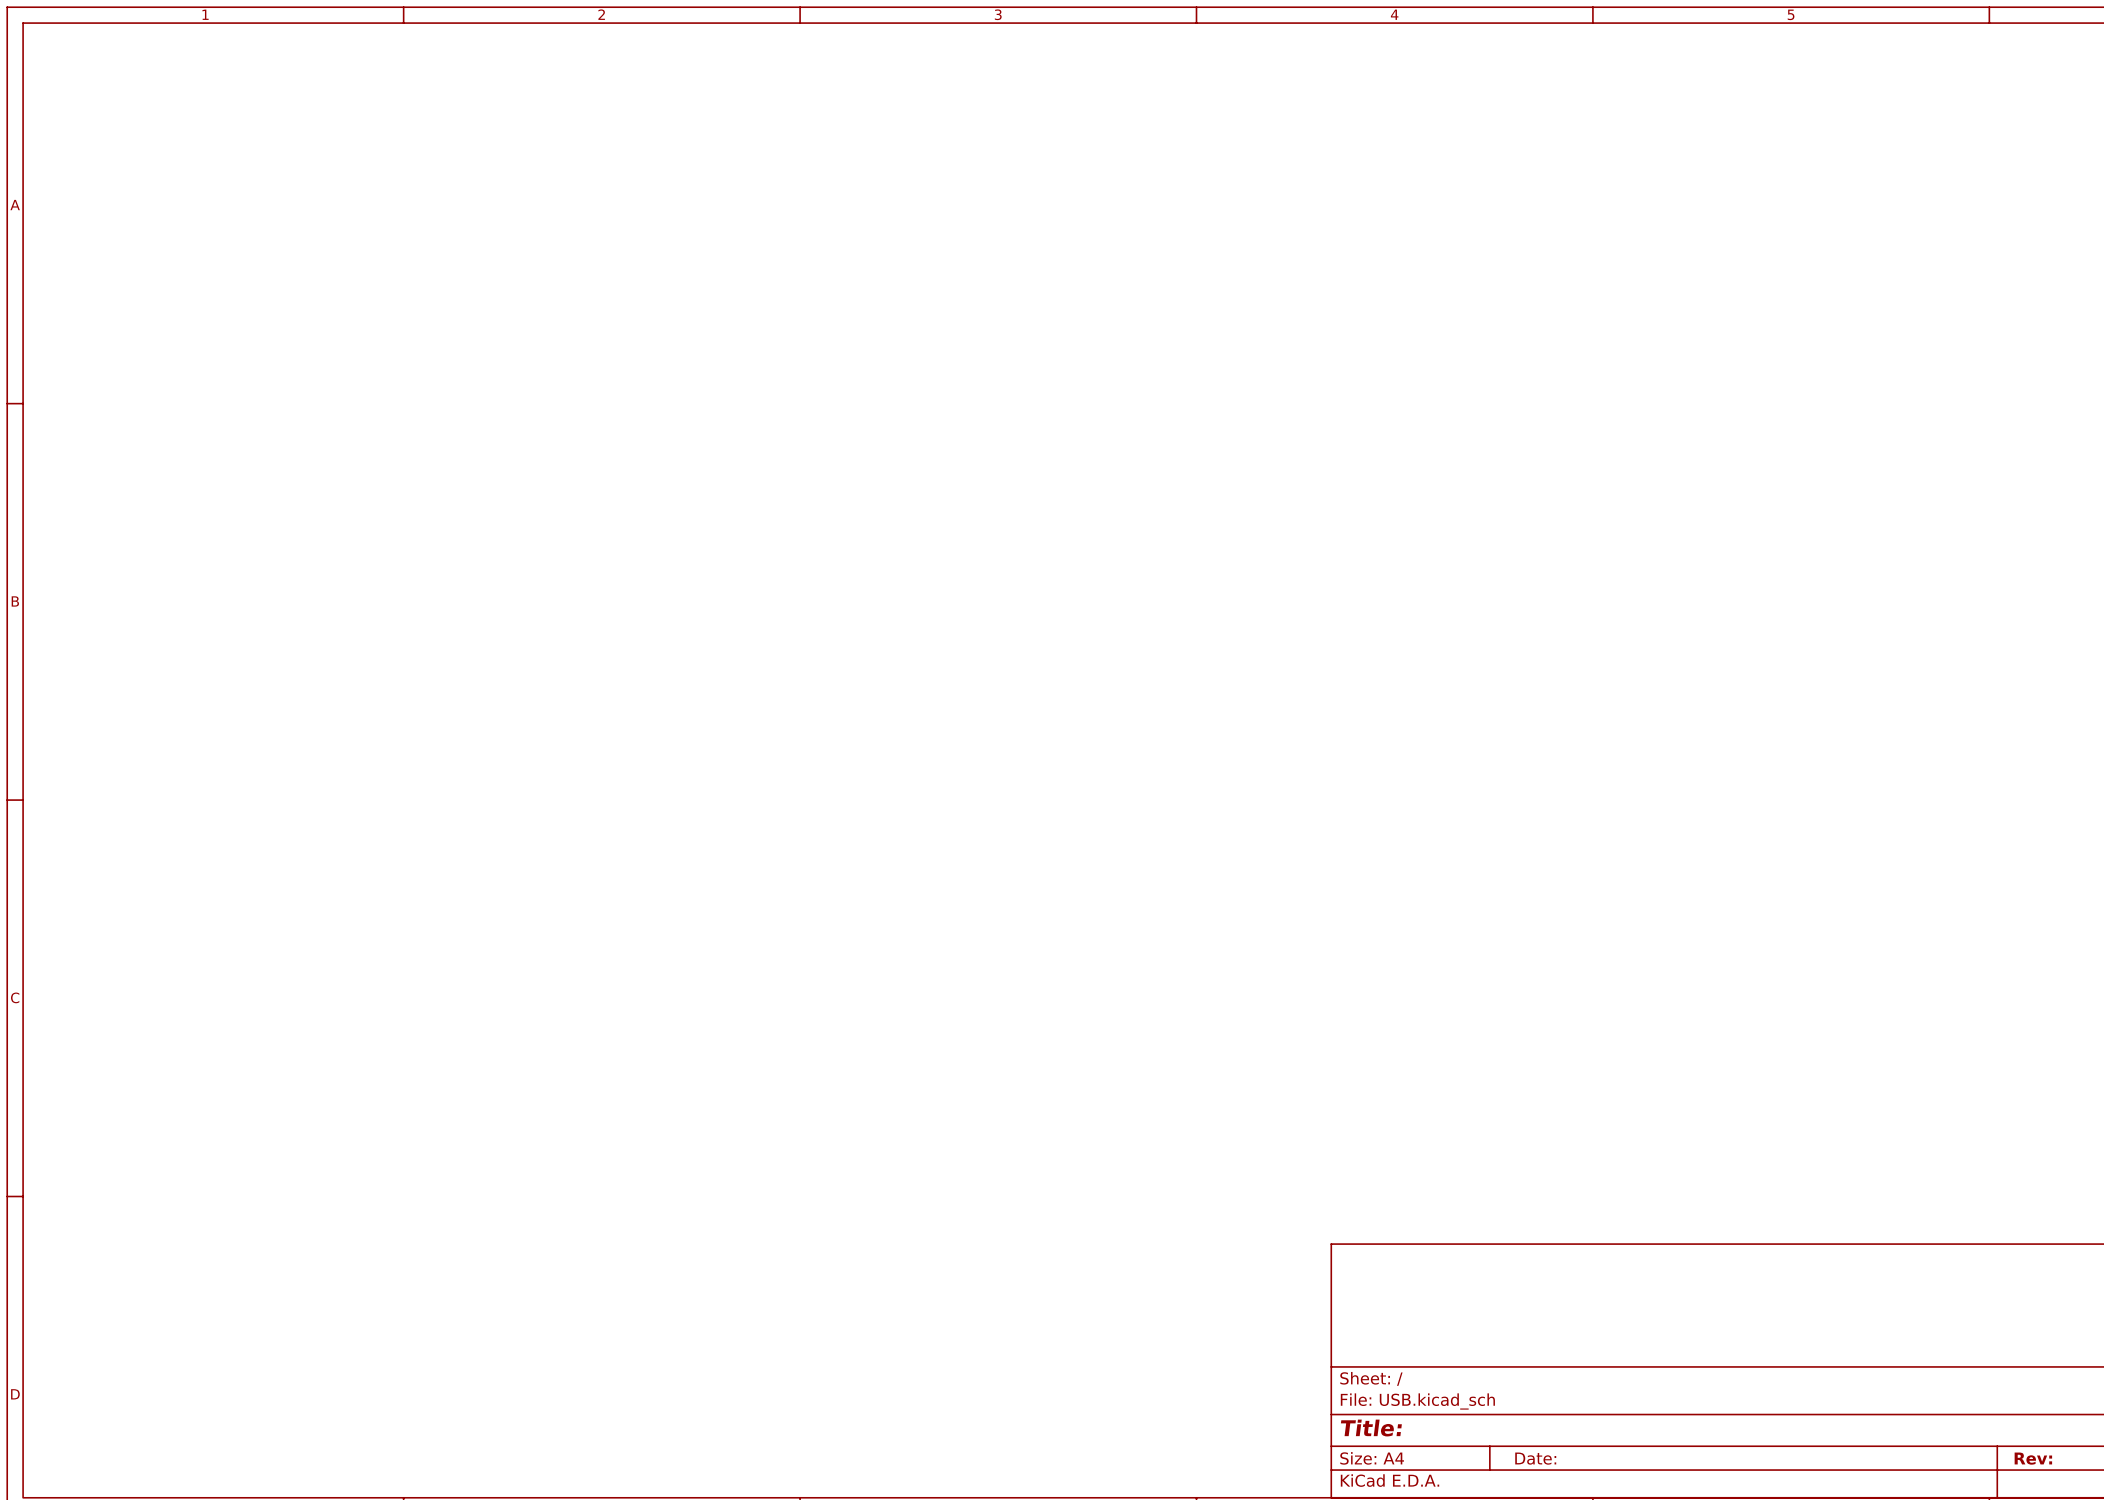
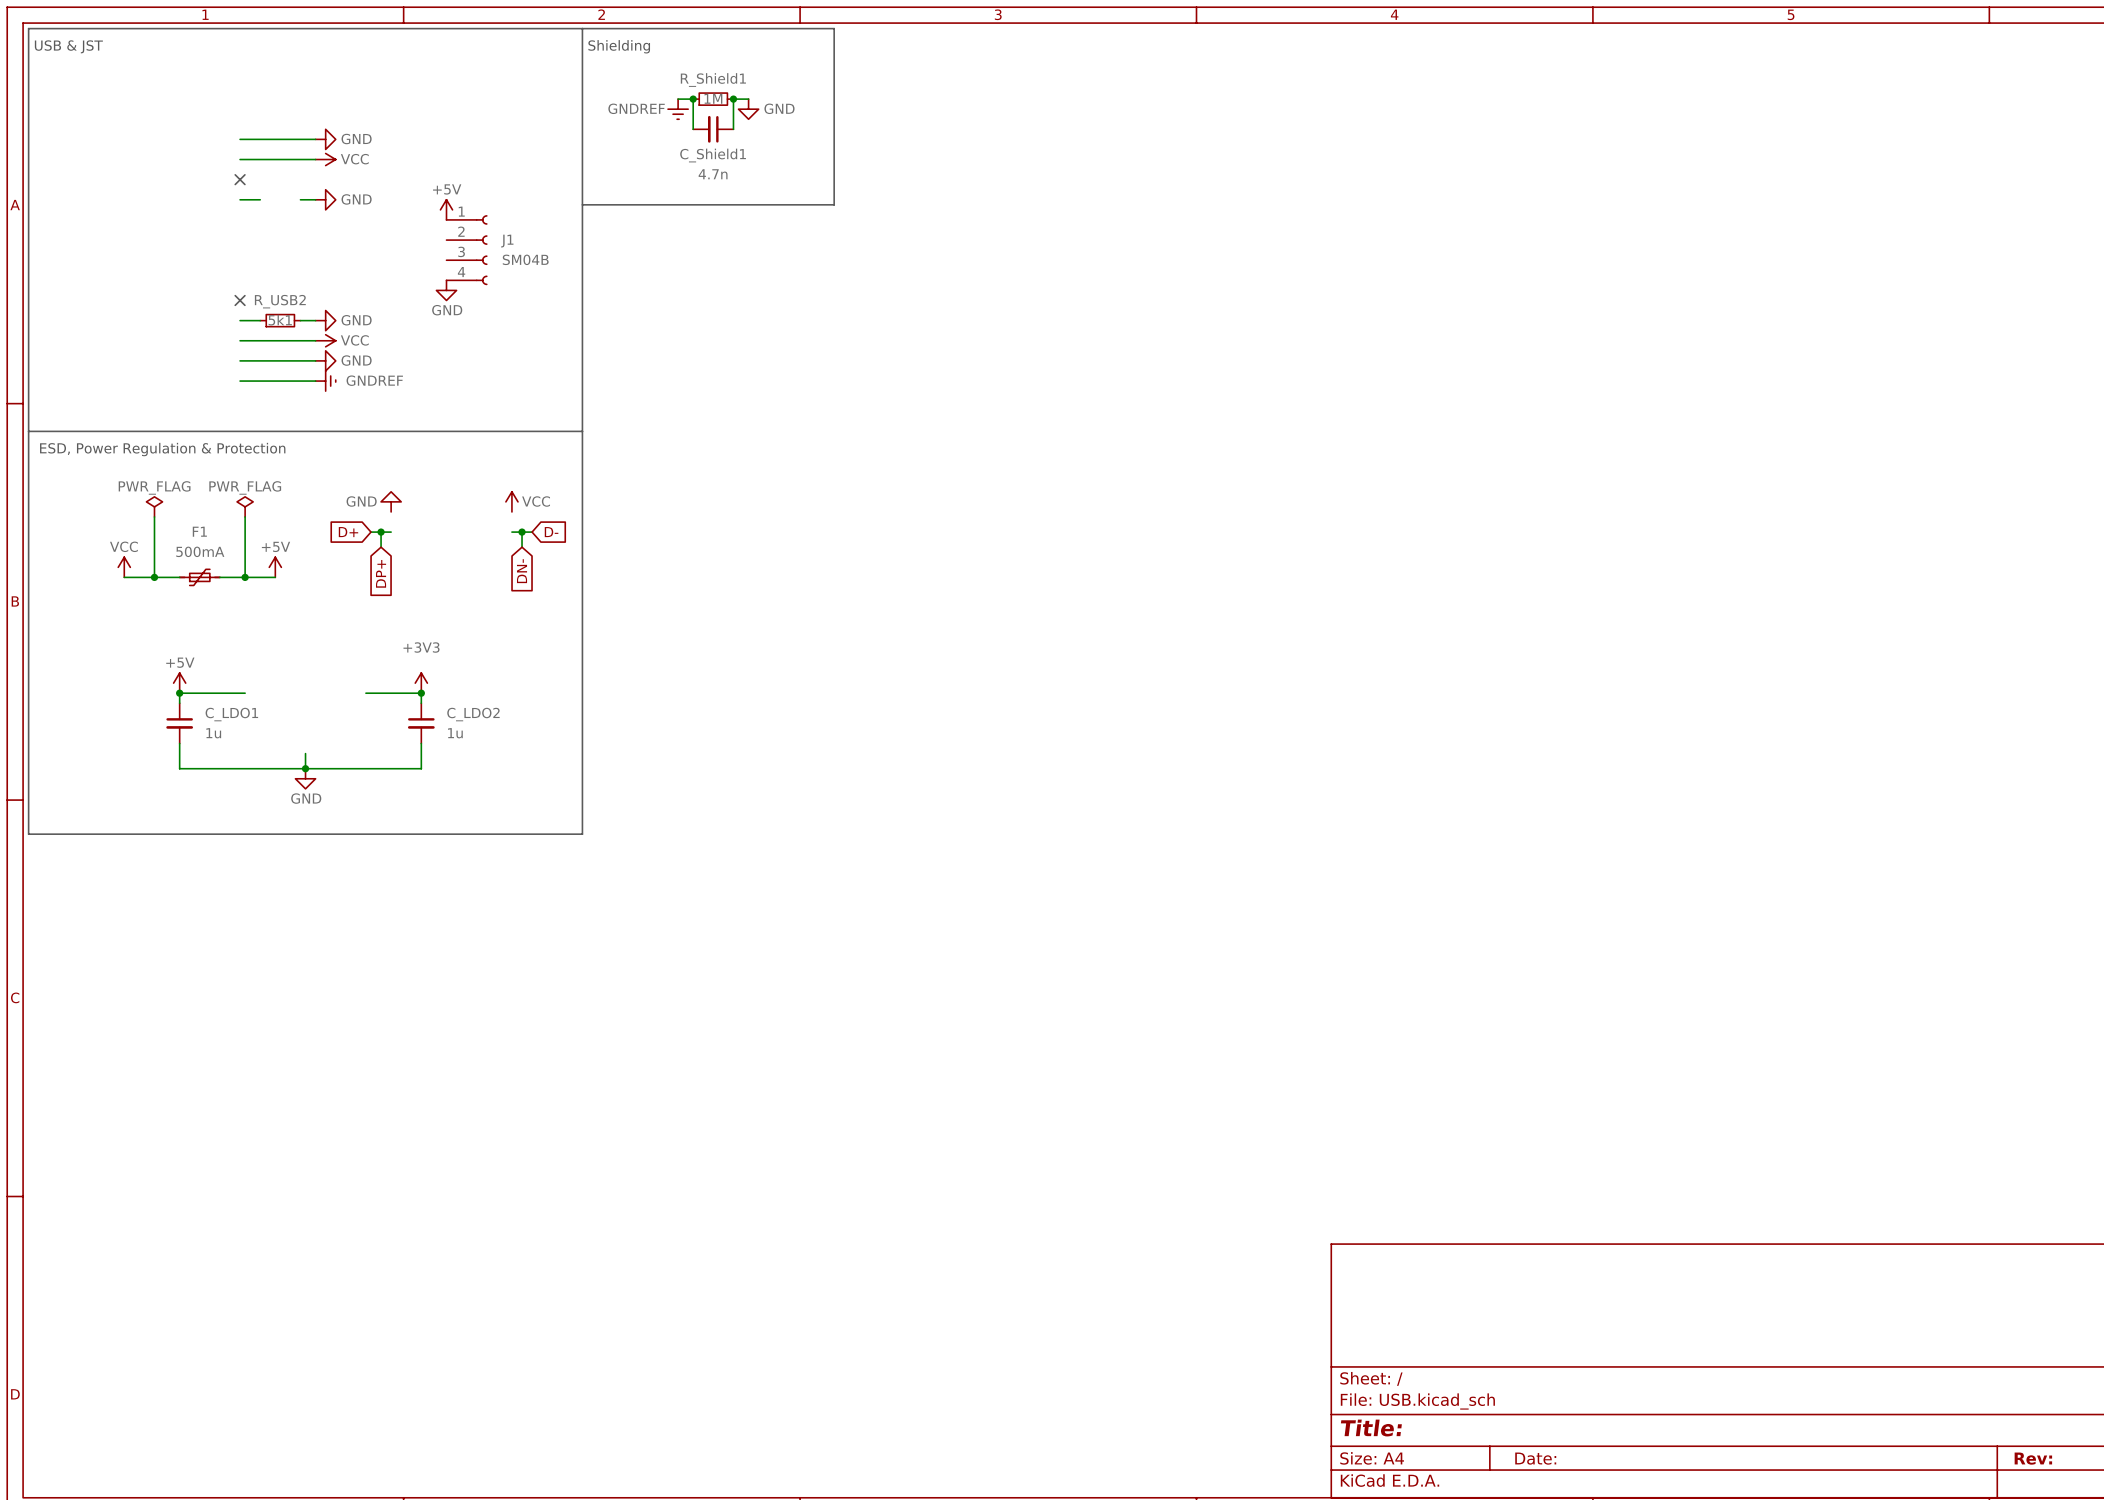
line: none -> (582, 28) (582, 834) (28, 834) (28, 28) (834, 28) (834, 204) (582, 204)
text: none -> USB & JST (68, 46)
text: none -> Shielding (619, 46)
wire: none -> (678, 99) (693, 99) (693, 129)
junction: none -> (693, 99)
R_Shield1: none -> 1M (713, 99)
junction: none -> (733, 99)
wire: none -> (748, 99) (733, 99) (733, 129)
power symbol: none -> GNDREF (678, 109)
power symbol: none -> GND (748, 109)
C_Shield1: none -> 4.7n (713, 129)
wire: none -> (240, 139) (315, 139)
power symbol: none -> GND (325, 139)
wire: none -> (240, 159) (315, 159)
power symbol: none -> VCC (325, 159)
no-connect mark: none -> (240, 179)
wire: none -> (240, 199) (260, 199)
wire: none -> (300, 199) (315, 199)
power symbol: none -> GND (325, 199)
power symbol: none -> +5V (446, 209)
J1: none -> SM04B (466, 250)
power symbol: none -> GND (446, 290)
no-connect mark: none -> (240, 300)
wire: none -> (240, 320) (260, 320)
R_USB2: none -> 5k1 (280, 320)
wire: none -> (300, 320) (315, 320)
power symbol: none -> GND (325, 320)
wire: none -> (240, 340) (315, 340)
power symbol: none -> VCC (325, 340)
wire: none -> (240, 360) (315, 360)
power symbol: none -> GND (325, 360)
wire: none -> (240, 381) (315, 381)
power symbol: none -> GNDREF (325, 381)
line: none -> (28, 431) (582, 431)
text: none -> ESD, Power Regulation & Protection (162, 449)
power symbol: none -> GND (391, 501)
power symbol: none -> VCC (511, 501)
power symbol: none -> PWR_FLAG (154, 506)
power symbol: none -> PWR_FLAG (245, 506)
wire: none -> (154, 516) (154, 577)
wire: none -> (245, 516) (245, 577)
global label: none -> D+ (348, 532)
wire: none -> (370, 532) (391, 532)
wire: none -> (381, 532) (381, 547)
junction: none -> (381, 532)
wire: none -> (511, 532) (532, 532)
wire: none -> (522, 532) (522, 547)
junction: none -> (522, 532)
global label: none -> D- (551, 532)
power symbol: none -> VCC (124, 567)
power symbol: none -> +5V (275, 567)
global label: none -> DN- (522, 571)
global label: none -> DP+ (381, 573)
wire: none -> (124, 577) (179, 577)
junction: none -> (154, 577)
F1: none -> 500mA (199, 577)
wire: none -> (219, 577) (275, 577)
junction: none -> (245, 577)
power symbol: none -> +5V (179, 683)
power symbol: none -> +3V3 (421, 683)
junction: none -> (179, 693)
wire: none -> (245, 693) (179, 693) (179, 703)
wire: none -> (365, 693) (421, 693) (421, 703)
junction: none -> (421, 693)
C_LDO1: none -> 1u (179, 723)
C_LDO2: none -> 1u (421, 723)
wire: none -> (179, 743) (179, 768) (421, 768) (421, 743)
wire: none -> (305, 753) (305, 768)
junction: none -> (305, 768)
power symbol: none -> GND (305, 778)

